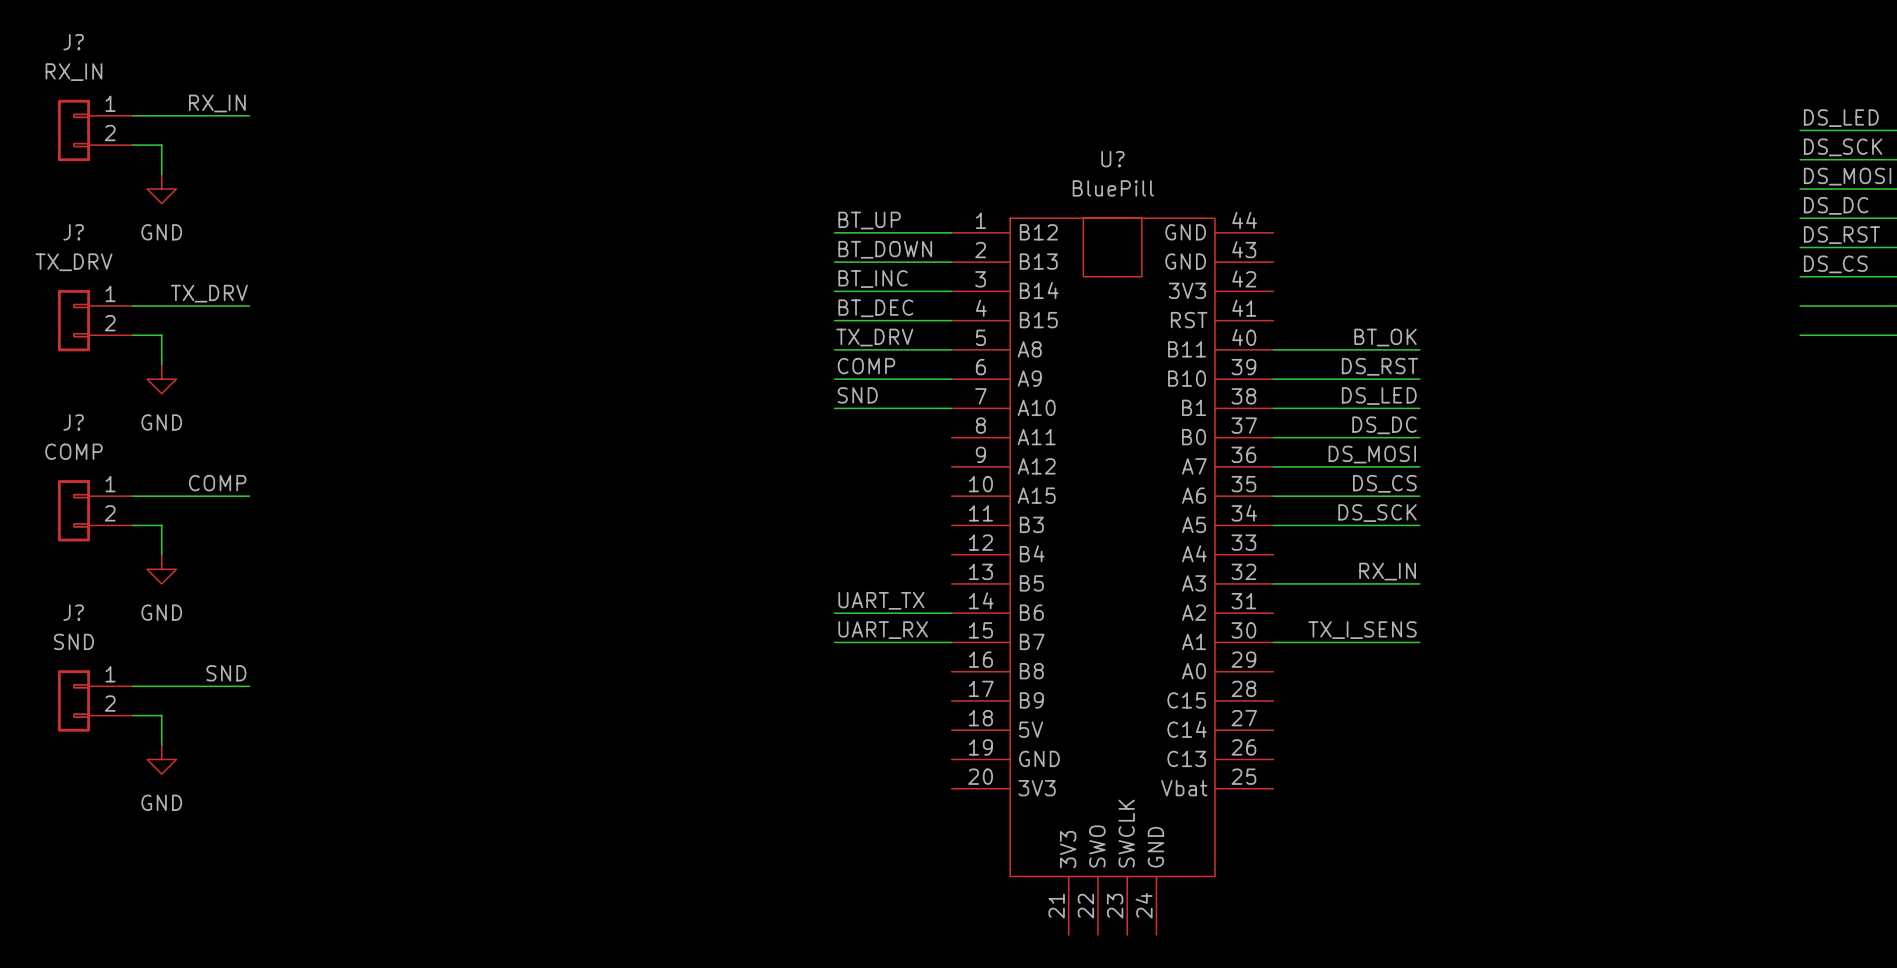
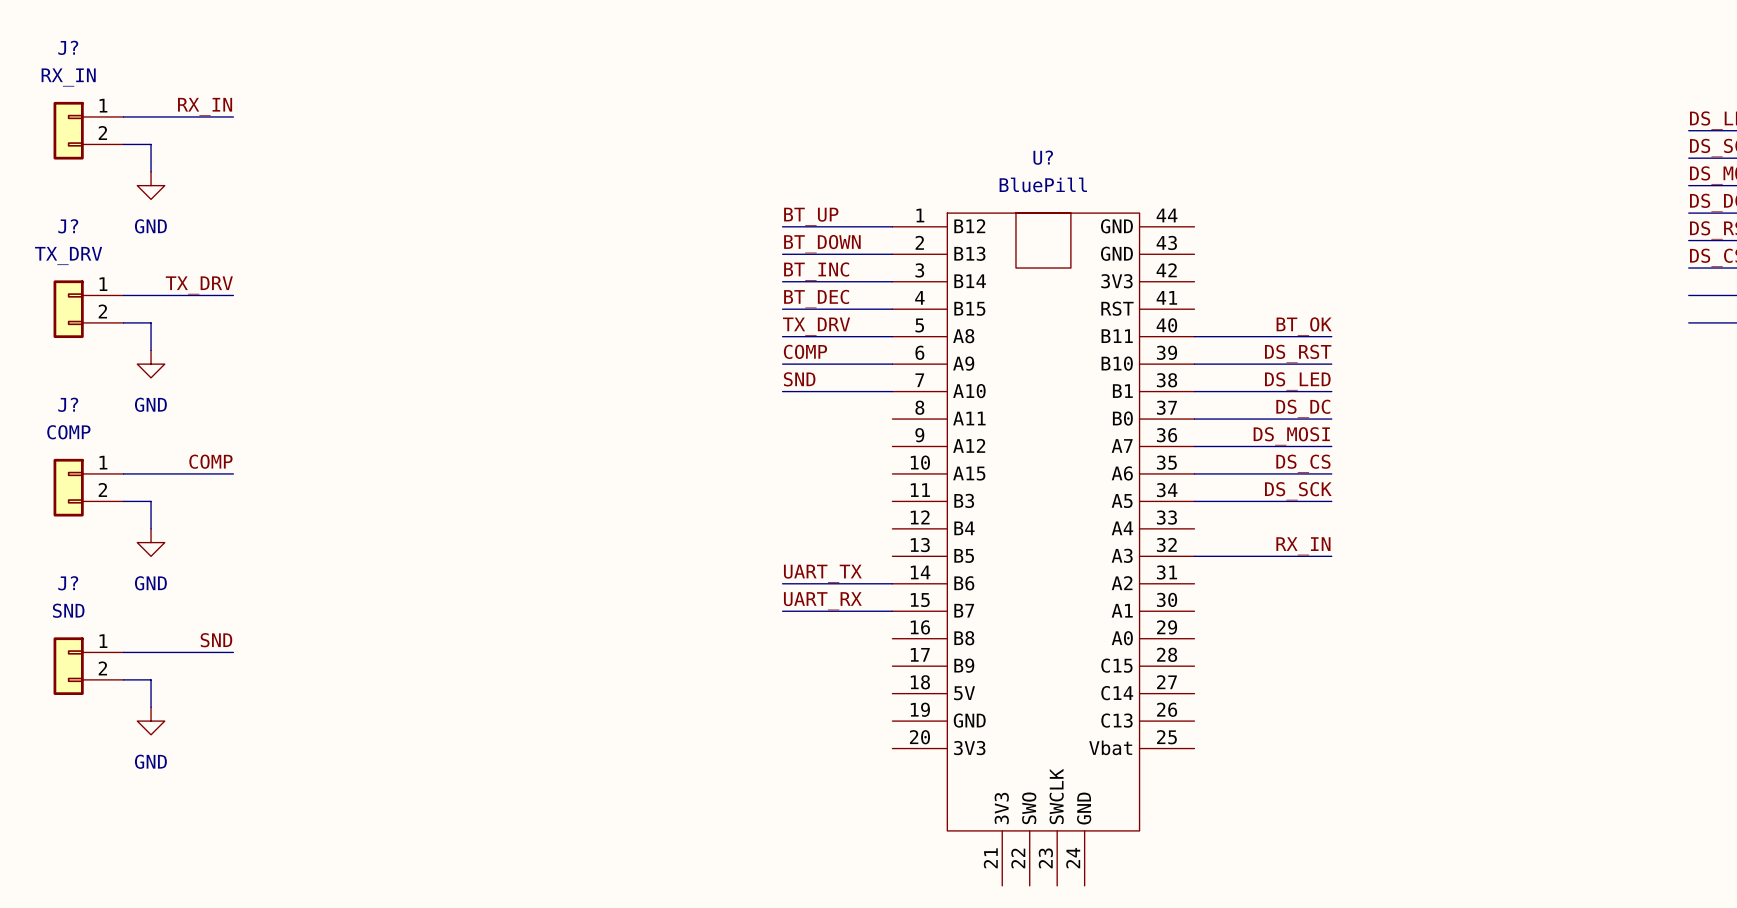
label: TX_I_SENS (1362, 630) -> none
wire: (1273, 642) (1419, 642) -> none

